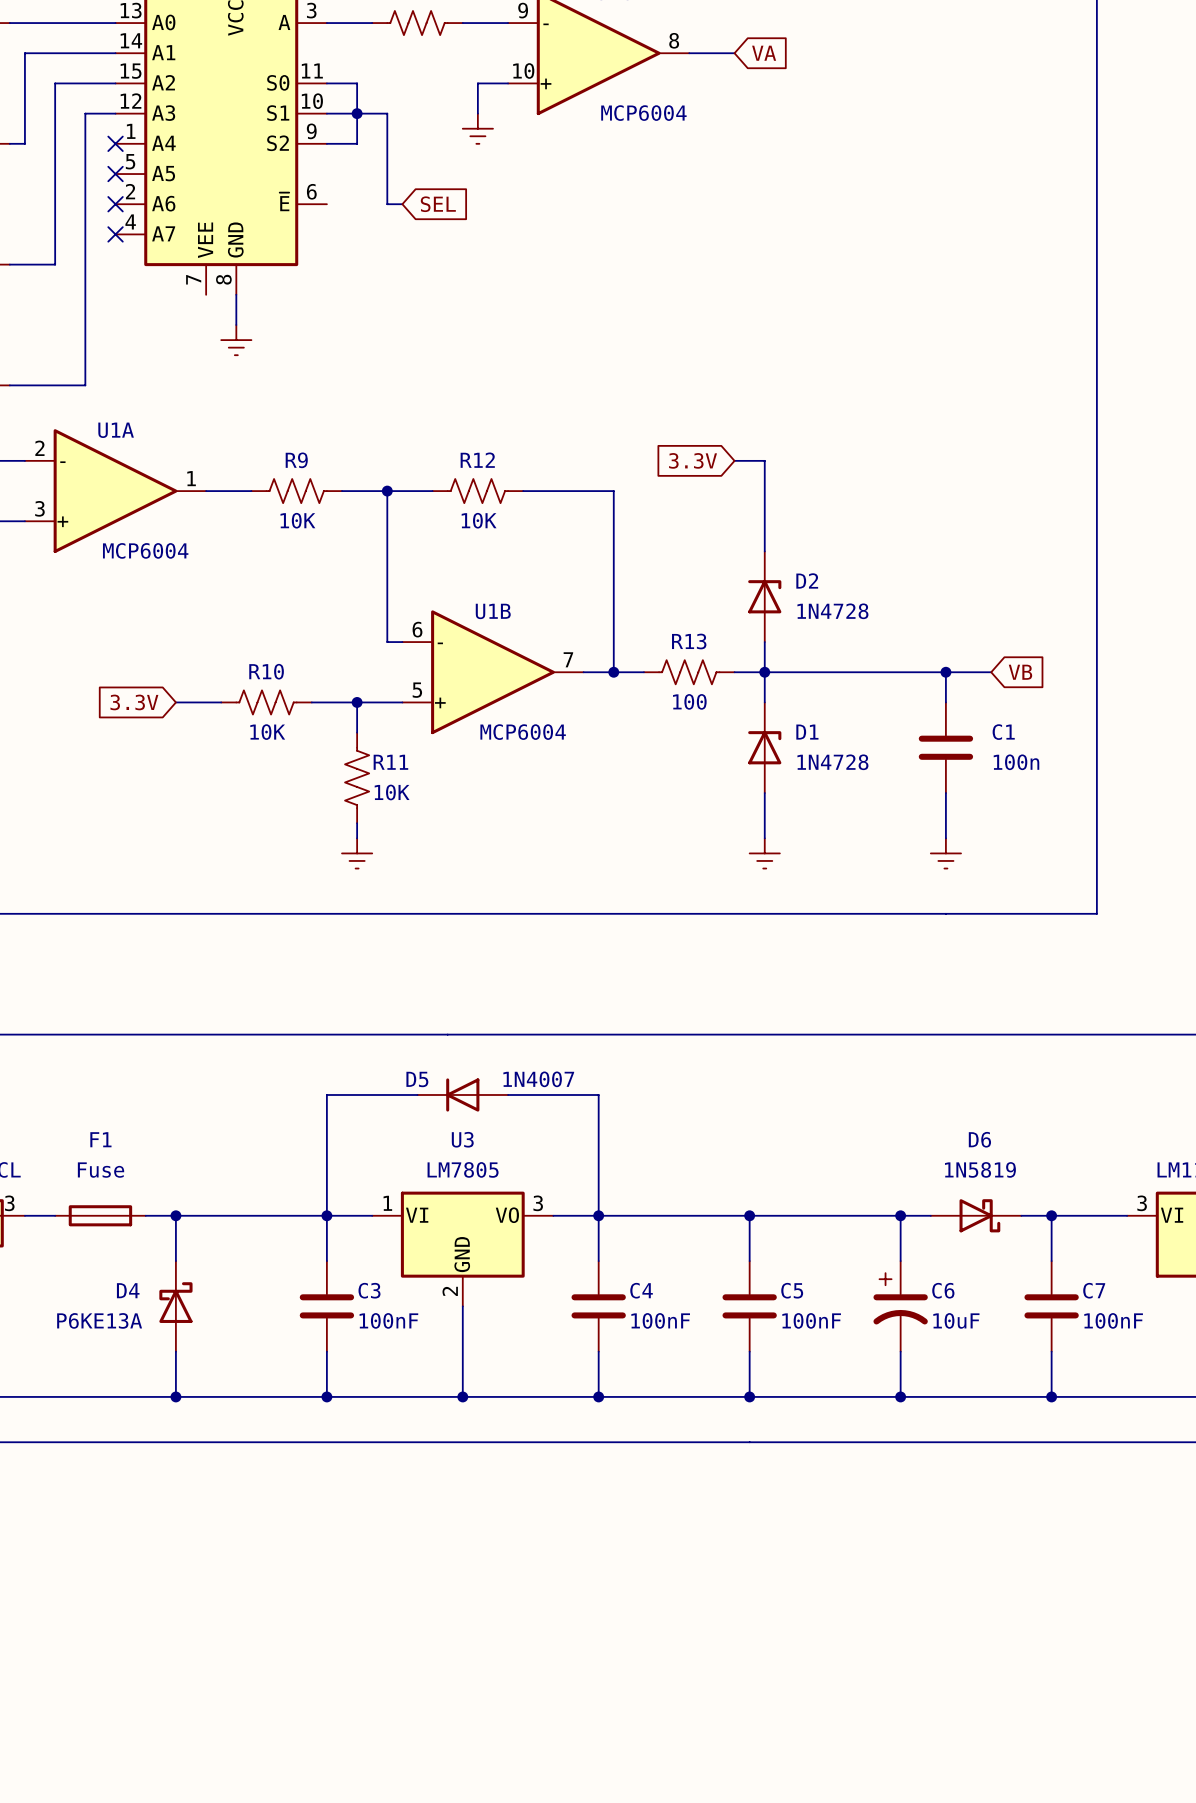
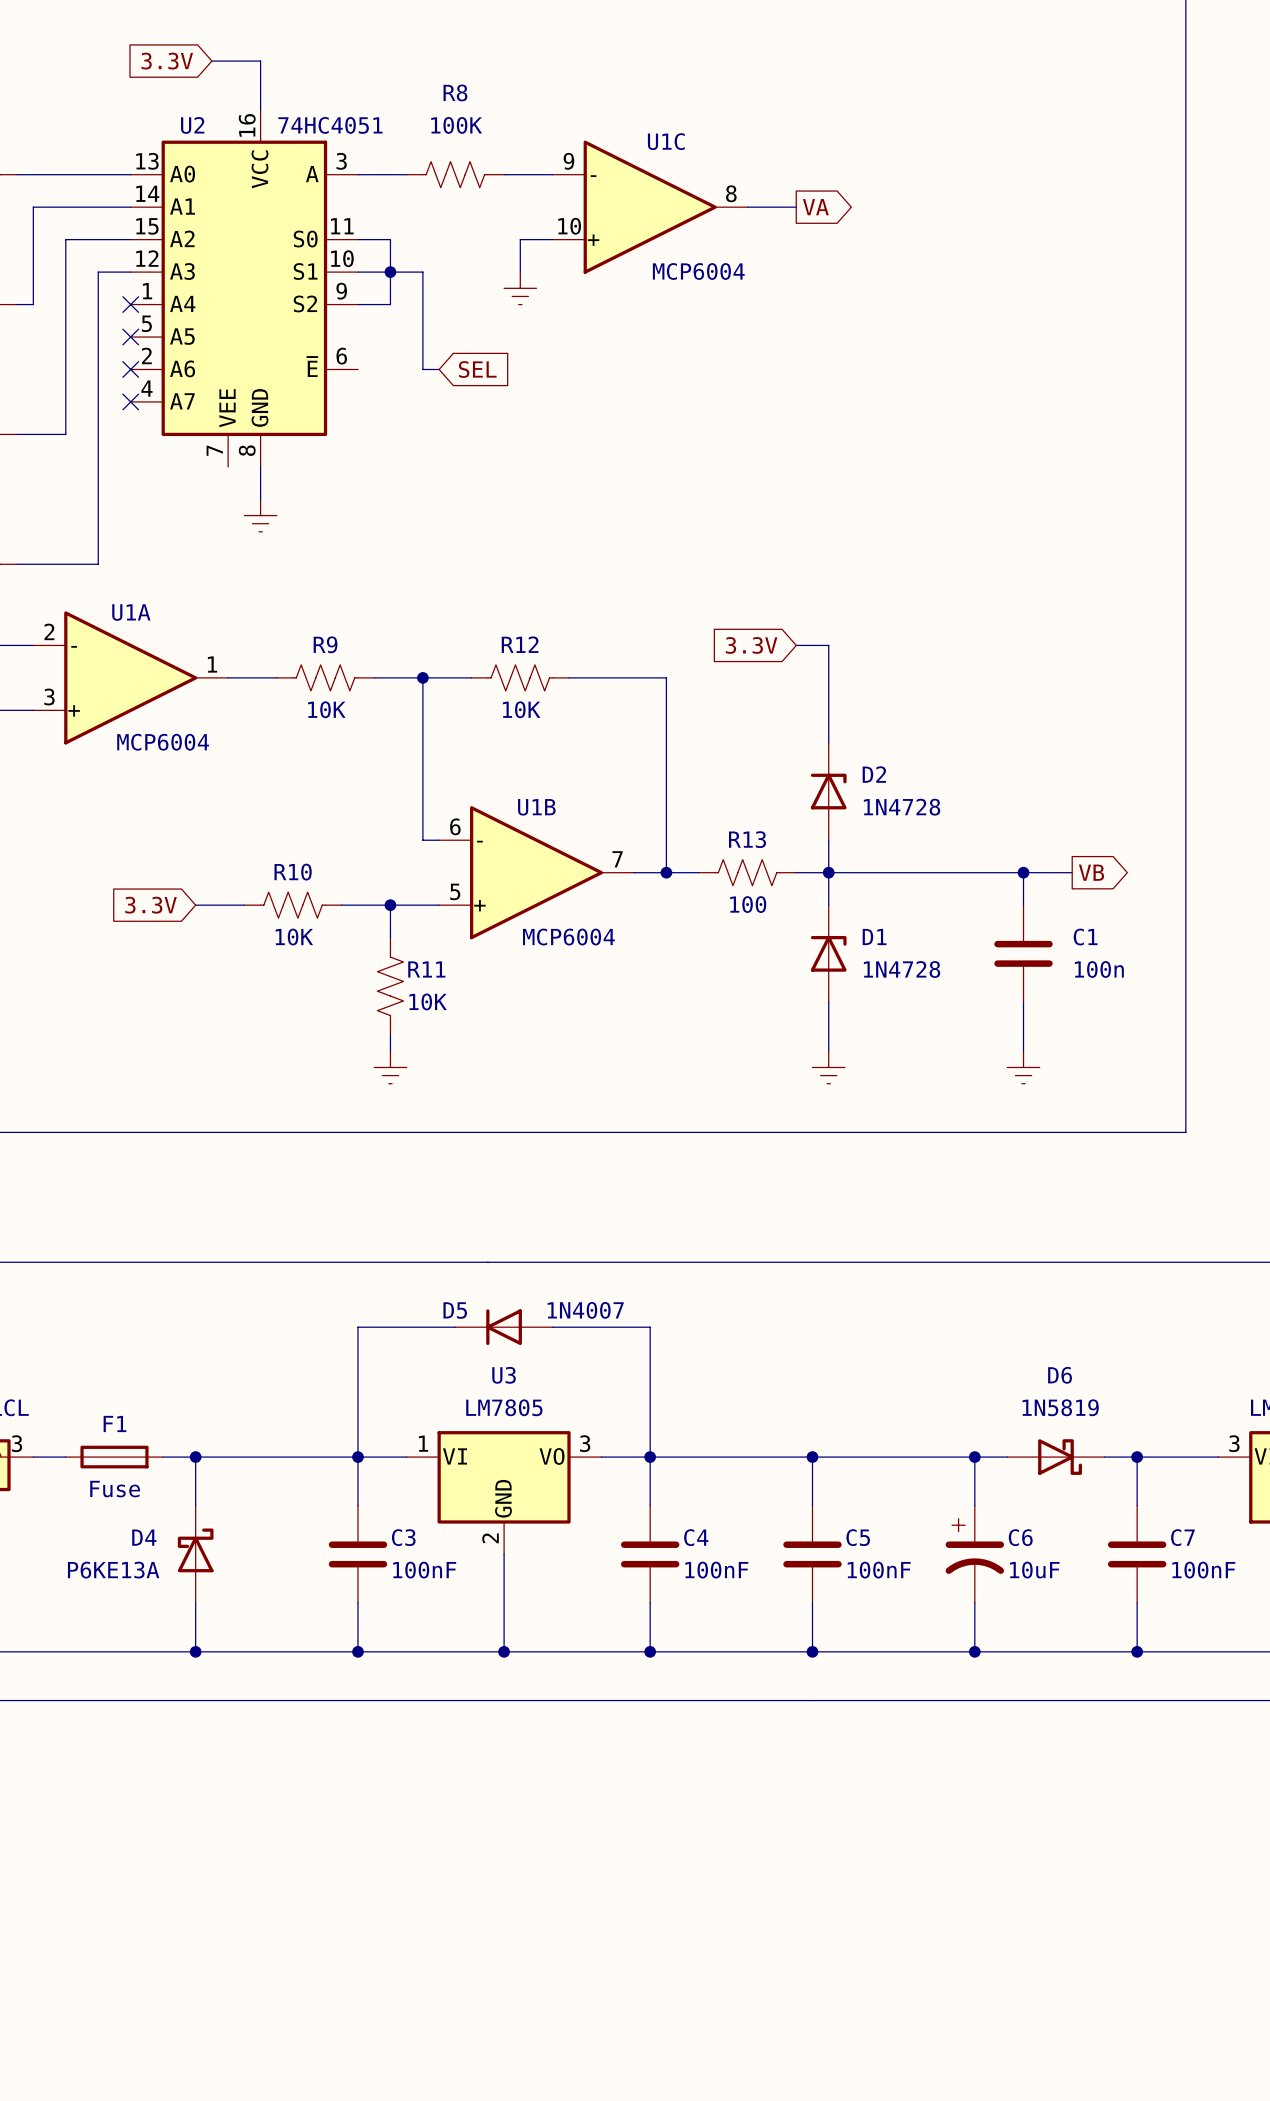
global label shape: input (764, 53) -> output (815, 207)
global label shape: input (1020, 672) -> output (1091, 872)
F1 name position: F1 (100, 1139) -> F1 (115, 1423)
F1 value position: Fuse (101, 1170) -> Fuse (115, 1489)

